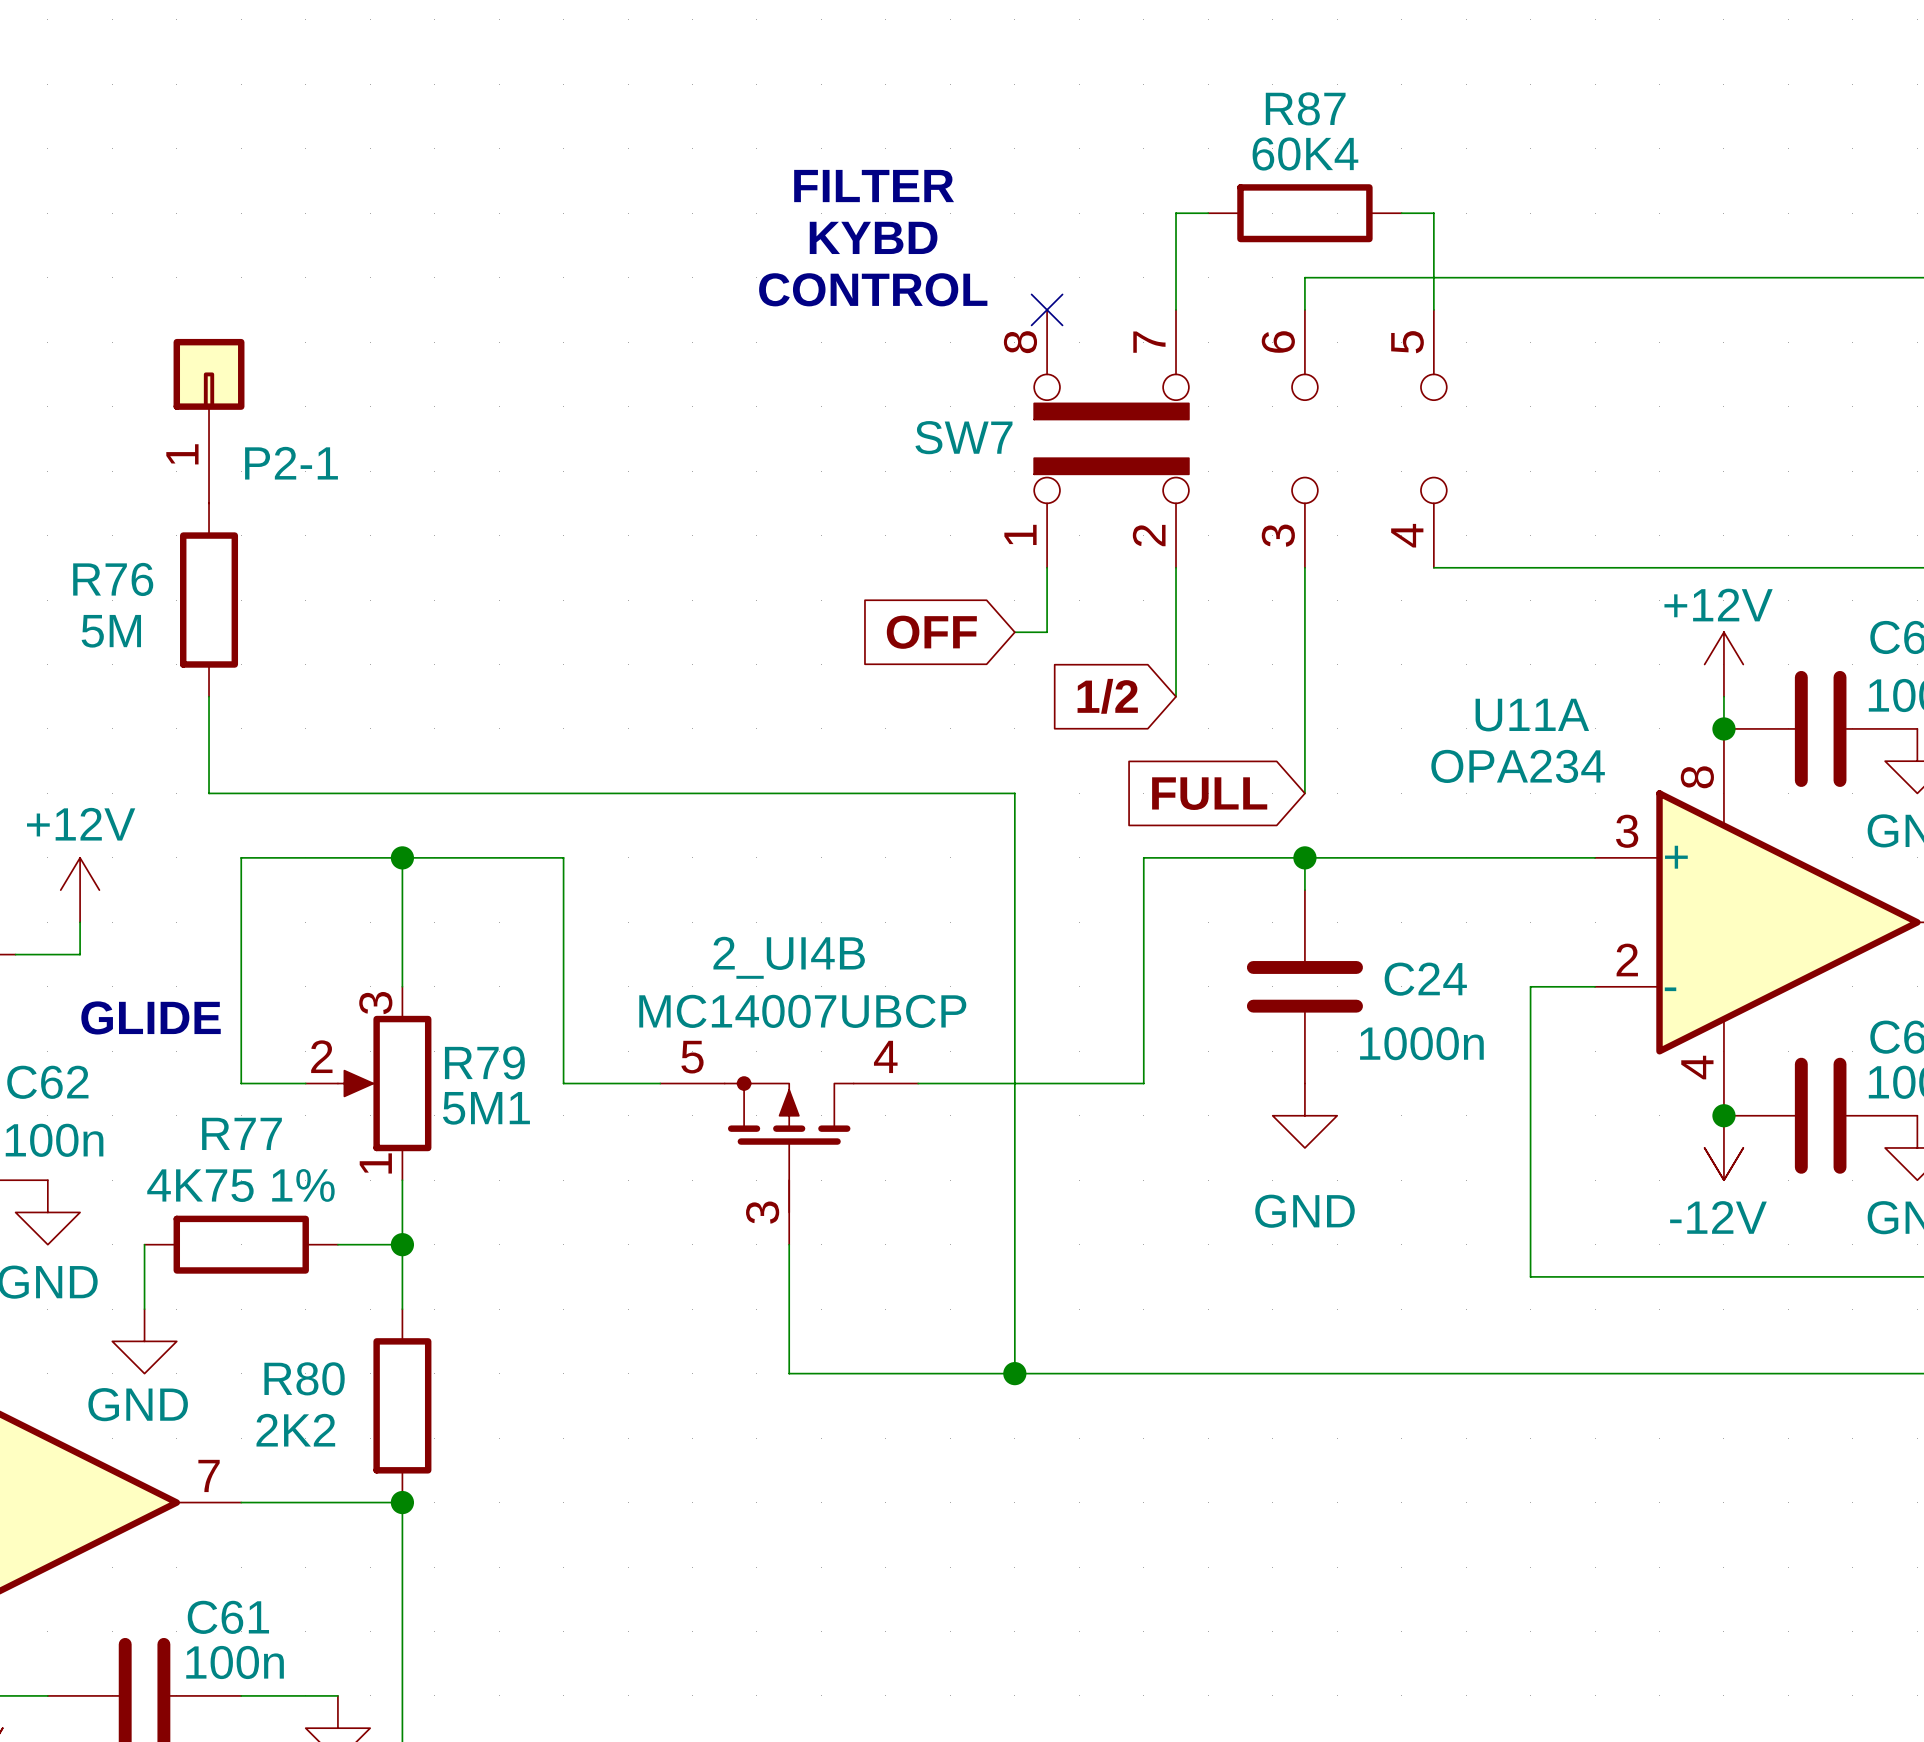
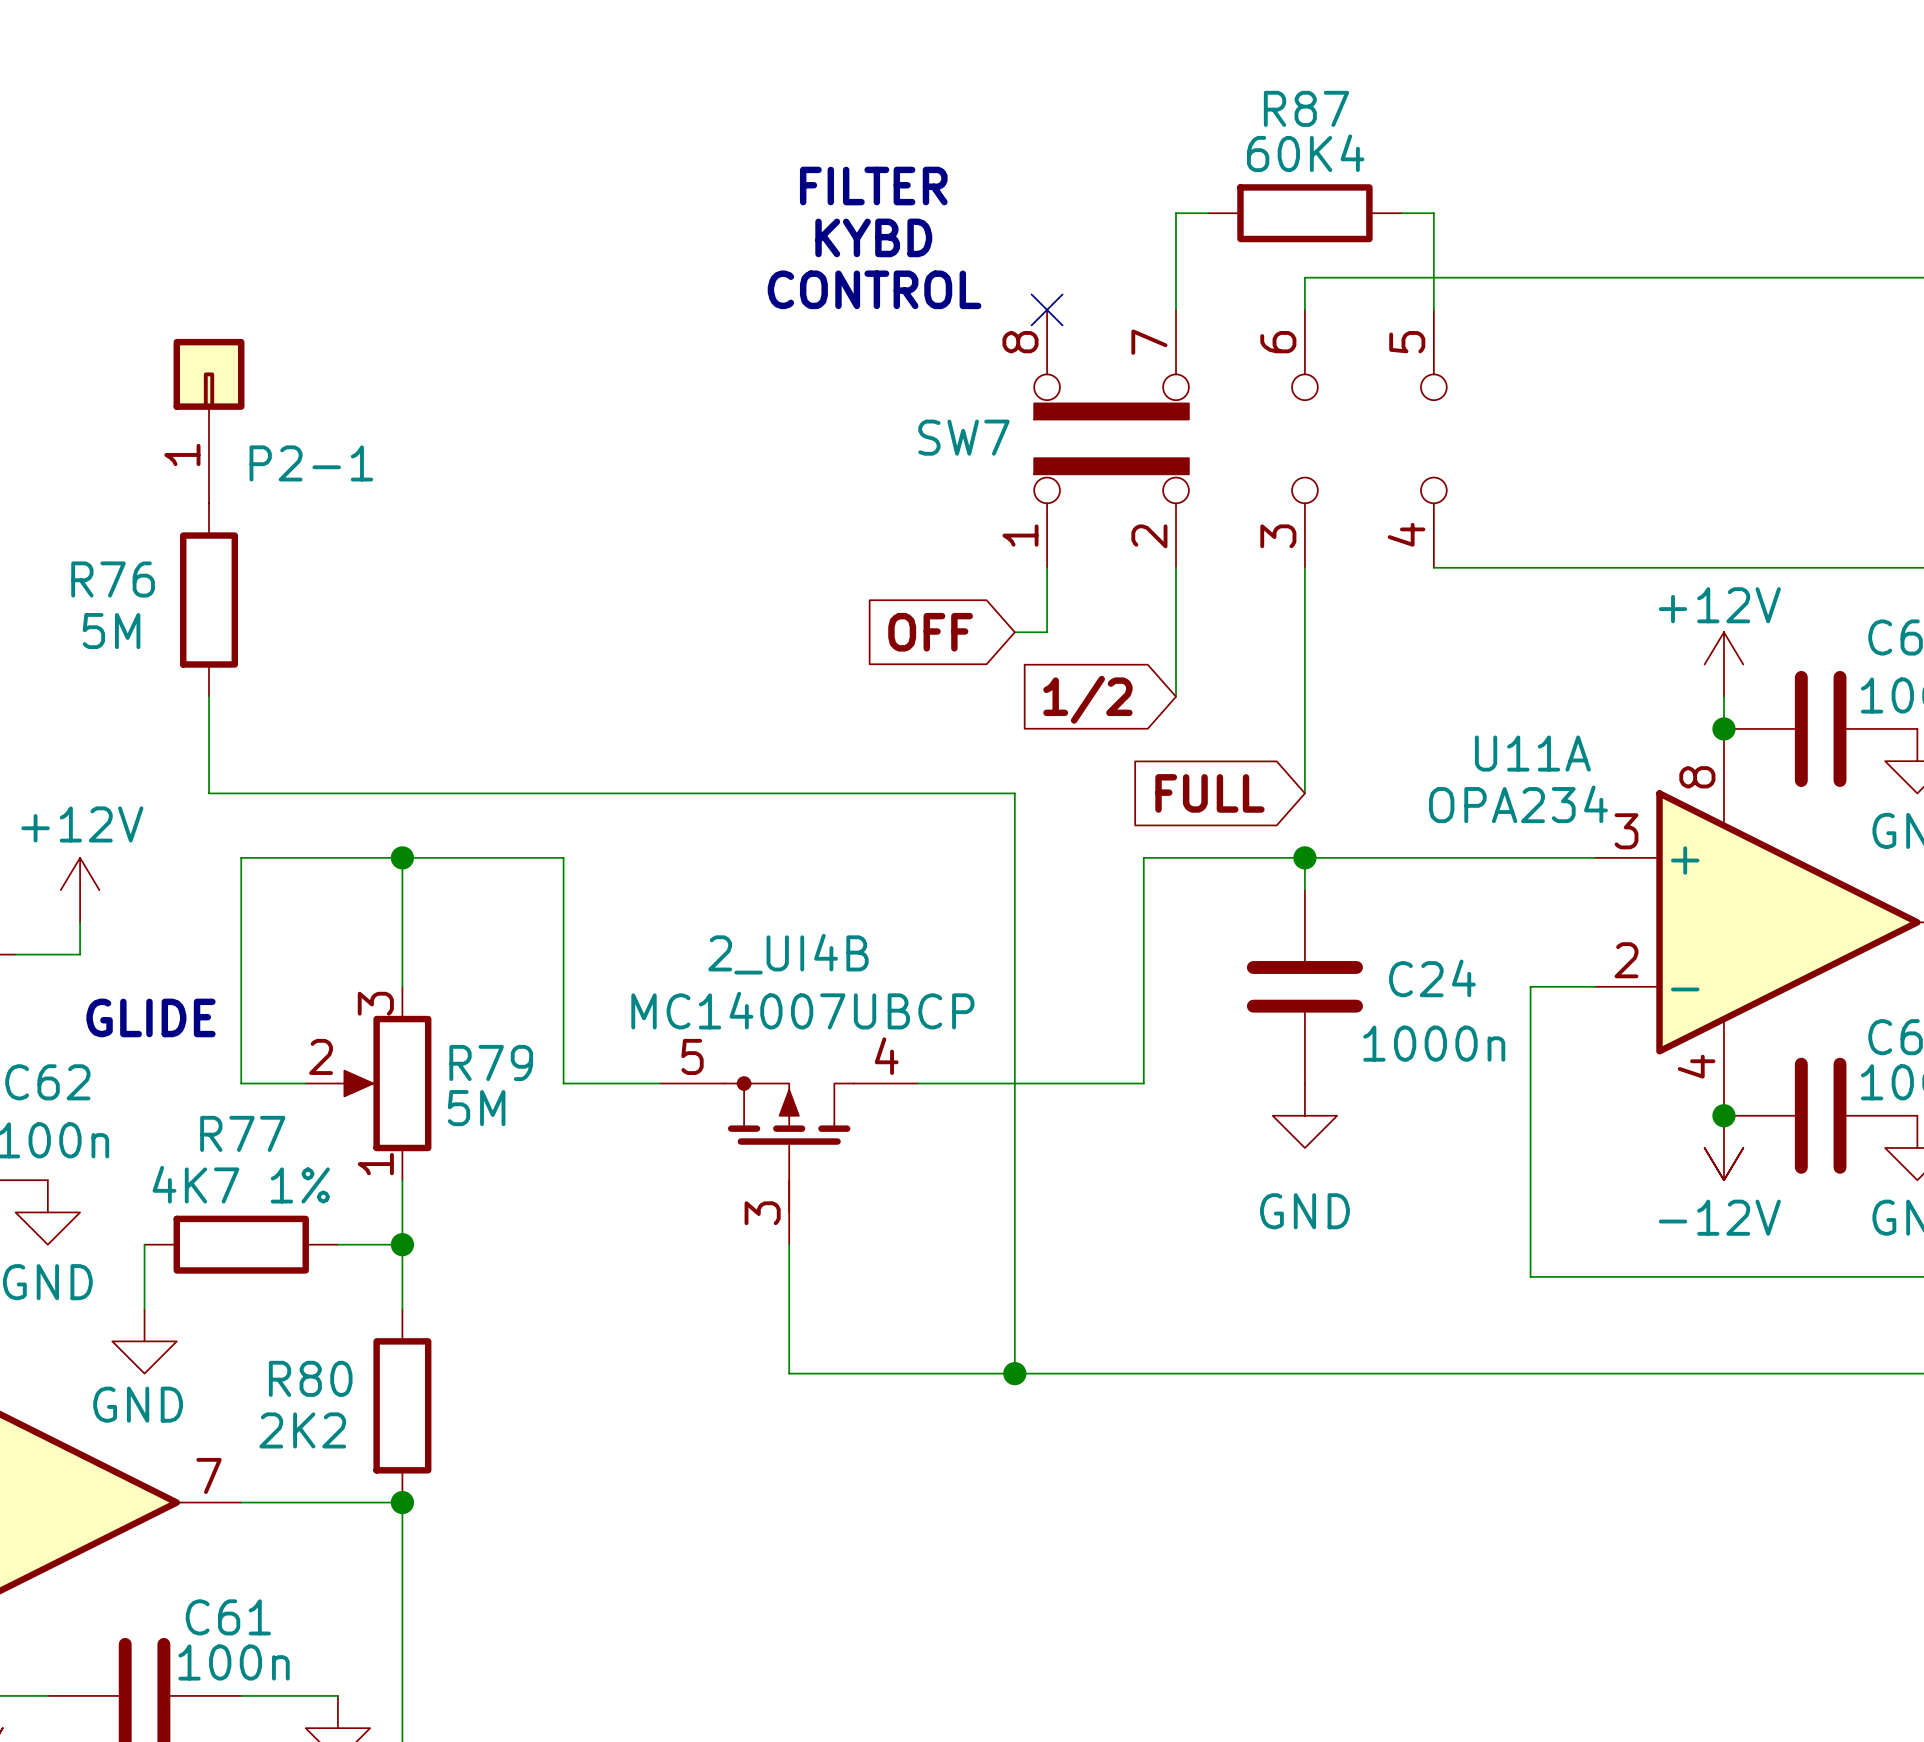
U11A name position: U11A (1532, 715) -> U11A (1532, 753)
U11A value position: OPA234 (1518, 766) -> OPA234 (1518, 804)
R79 value: 5M1 (486, 1108) -> 5M (476, 1108)
R77 value: 4K75 1% (240, 1185) -> 4K7 1% (241, 1184)

